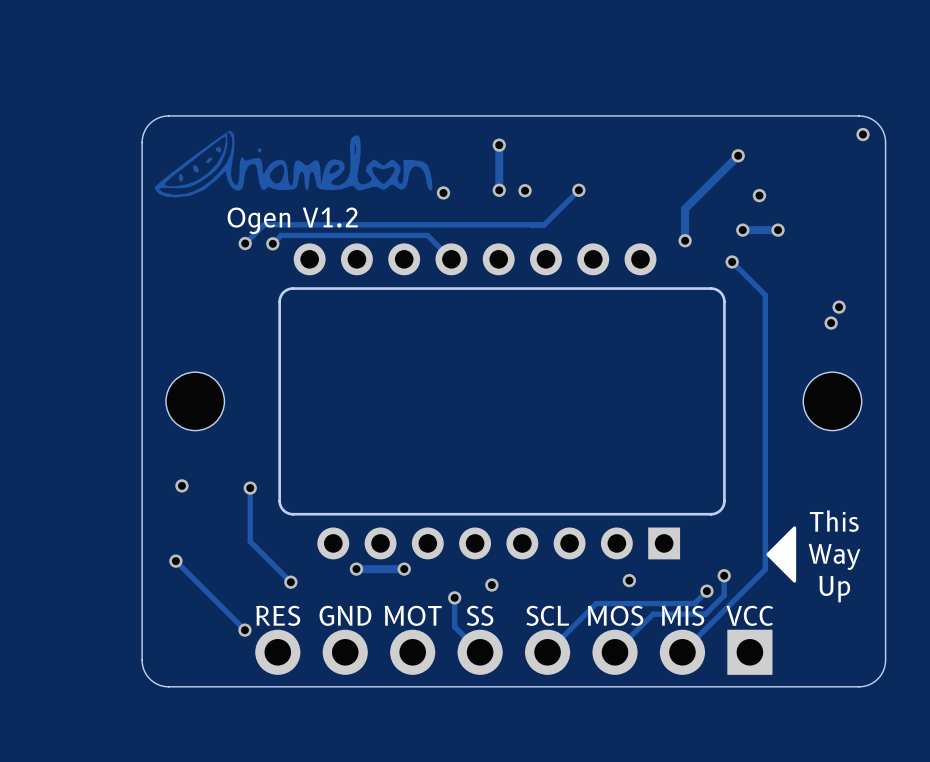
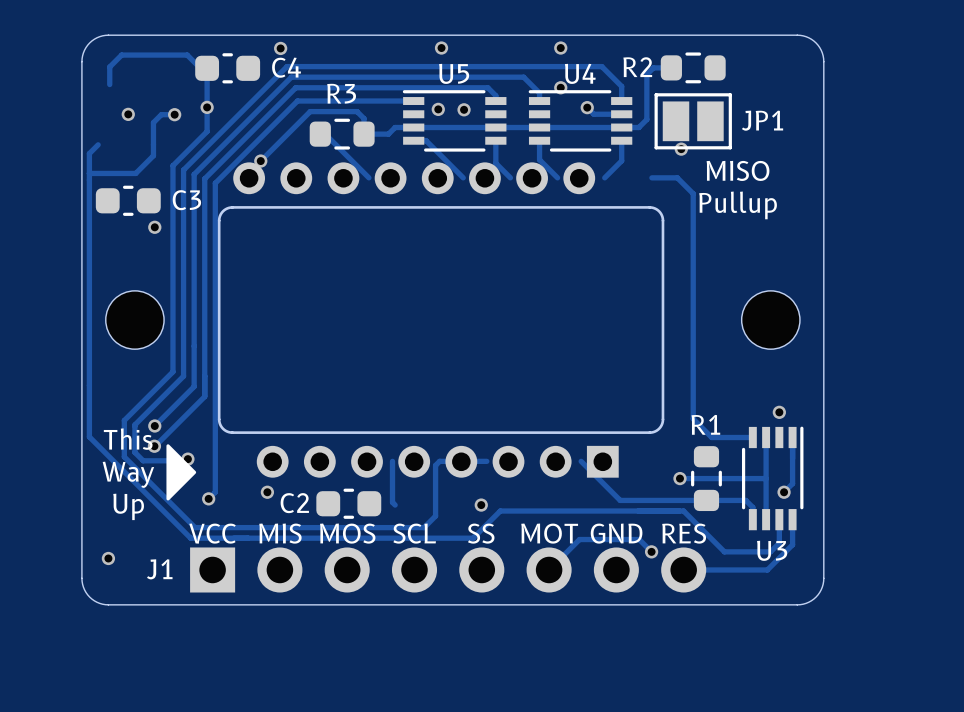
via: none -> (560, 48)
via: none -> (280, 48)
drawing: [154, 130, 433, 198] -> none
via: (863, 134) -> none
track: (499, 145) (499, 190) -> none
via position: (499, 145) -> (441, 48)
track: none -> (671, 67) (653, 67) (646, 74) (646, 119) (638, 127) (395, 127) (388, 134) (364, 134) (364, 118) (357, 111) (310, 111) (260, 161)
R2: none -> (693, 67)
track: none -> (200, 68) (187, 55) (121, 55) (109, 66) (109, 84)
track: none -> (207, 68) (207, 131) (172, 165) (172, 371) (124, 420) (124, 456) (195, 527) (424, 527) (435, 516) (435, 465) (439, 461) (486, 461)
C4: none -> (227, 68)
track: (738, 155) (685, 208) (685, 240) -> none
via: (738, 155) -> none
via: none -> (560, 87)
track: none -> (413, 101) (297, 101) (215, 183) (215, 492) (208, 498)
track: none -> (495, 101) (495, 95) (487, 87) (295, 87) (204, 178) (204, 396) (154, 446)
track: none -> (539, 101) (539, 93) (523, 77) (291, 77) (194, 174) (194, 386) (154, 426)
track: none -> (621, 101) (621, 86) (601, 66) (287, 66) (183, 170) (183, 376) (134, 424) (134, 452) (143, 460) (186, 460) (187, 459)
via: none -> (207, 107)
track: none -> (587, 107) (593, 114) (621, 114)
via: none -> (587, 107)
track: (578, 190) (544, 224) (263, 224) (245, 243) -> none
via: (578, 190) -> none
via: (443, 192) -> none
via: none -> (128, 114)
track: none -> (174, 114) (161, 114) (153, 122) (153, 155) (135, 173) (89, 173)
via: none -> (174, 114)
via: (759, 195) -> none
U5: none -> (454, 120)
U4: none -> (580, 120)
JP1: none -> (693, 121)
track: none -> (320, 134) (325, 134) (368, 177)
R3: none -> (342, 134)
text: Ogen V1.2 (292, 220) -> none
track: none -> (413, 140) (426, 140) (463, 177)
track: none -> (495, 140) (495, 163) (510, 177)
track: none -> (539, 140) (539, 159) (557, 177)
track: none -> (621, 140) (621, 160) (604, 177)
track: none -> (98, 144) (89, 153) (89, 436) (190, 538) (473, 538) (500, 511) (683, 511) (724, 551) (770, 551) (779, 543) (779, 519)
track: (742, 230) (778, 230) -> none
via: (778, 230) -> none
via: (685, 240) -> none
via: none -> (260, 161)
via: (245, 243) -> none
track: (272, 243) (281, 235) (427, 235) (451, 259) -> none
via: (272, 243) -> none
text: none -> MISO (738, 170)
track: none -> (651, 177) (677, 177) (693, 193) (693, 418) (711, 437) (752, 437)
track: (732, 261) (765, 295) (765, 569) (682, 652) -> none
via: (732, 261) -> none
C3: none -> (128, 200)
text: none -> Pullup (738, 205)
via: (839, 307) -> none
via: none -> (154, 227)
via: (831, 323) -> none
via: (181, 485) -> none
track: (250, 488) (250, 541) (290, 582) -> none
via: (250, 488) -> none
via: none -> (779, 412)
via: none -> (154, 426)
track: none -> (766, 437) (766, 519)
track: none -> (792, 437) (792, 483) (784, 492)
text position: This (834, 521) -> This (128, 439)
drawing: none -> [166, 444, 197, 501]
drawing: [766, 526, 797, 583] -> none
via: none -> (154, 446)
via: none -> (187, 459)
track: none -> (392, 461) (392, 502) (395, 505)
track: none -> (581, 461) (620, 500) (745, 500) (752, 507) (752, 519)
text position: Way (834, 556) -> Way (128, 474)
track: none -> (679, 478) (766, 478)
via: none -> (679, 478)
R1: none -> (706, 478)
U3: none -> (772, 478)
track: (175, 561) (244, 630) -> none
via: (175, 561) -> none
track: (356, 569) (404, 569) -> none
via: (356, 569) -> none
via: (404, 569) -> none
via: none -> (267, 492)
via: none -> (784, 492)
track: (724, 575) (724, 595) (705, 614) (653, 614) (615, 652) -> none
via: (724, 575) -> none
via: none -> (208, 498)
via: (629, 580) -> none
via: (290, 582) -> none
C2: none -> (348, 503)
via: (491, 585) -> none
via: none -> (481, 505)
text position: Up (834, 589) -> Up (128, 506)
track: (706, 591) (694, 603) (596, 603) (547, 652) -> none
via: (706, 591) -> none
track: (454, 597) (454, 626) (480, 652) -> none
via: (454, 597) -> none
track: none -> (792, 519) (792, 544) (767, 569) (683, 569)
text position: RES (278, 615) -> RES (684, 533)
text position: GND (345, 615) -> GND (616, 533)
text position: MOT (413, 615) -> MOT (549, 533)
text position: SS (480, 615) -> SS (481, 533)
text position: SCL (547, 615) -> SCL (414, 533)
text position: MOS (615, 615) -> MOS (347, 533)
text position: MIS (682, 615) -> MIS (280, 533)
text position: VCC (749, 615) -> VCC (212, 533)
via: (244, 630) -> none
track: none -> (651, 551) (639, 539) (579, 539) (549, 569)
via: none -> (651, 551)
via: none -> (108, 558)
J1 side: bottom (513, 652) -> top (448, 569)

